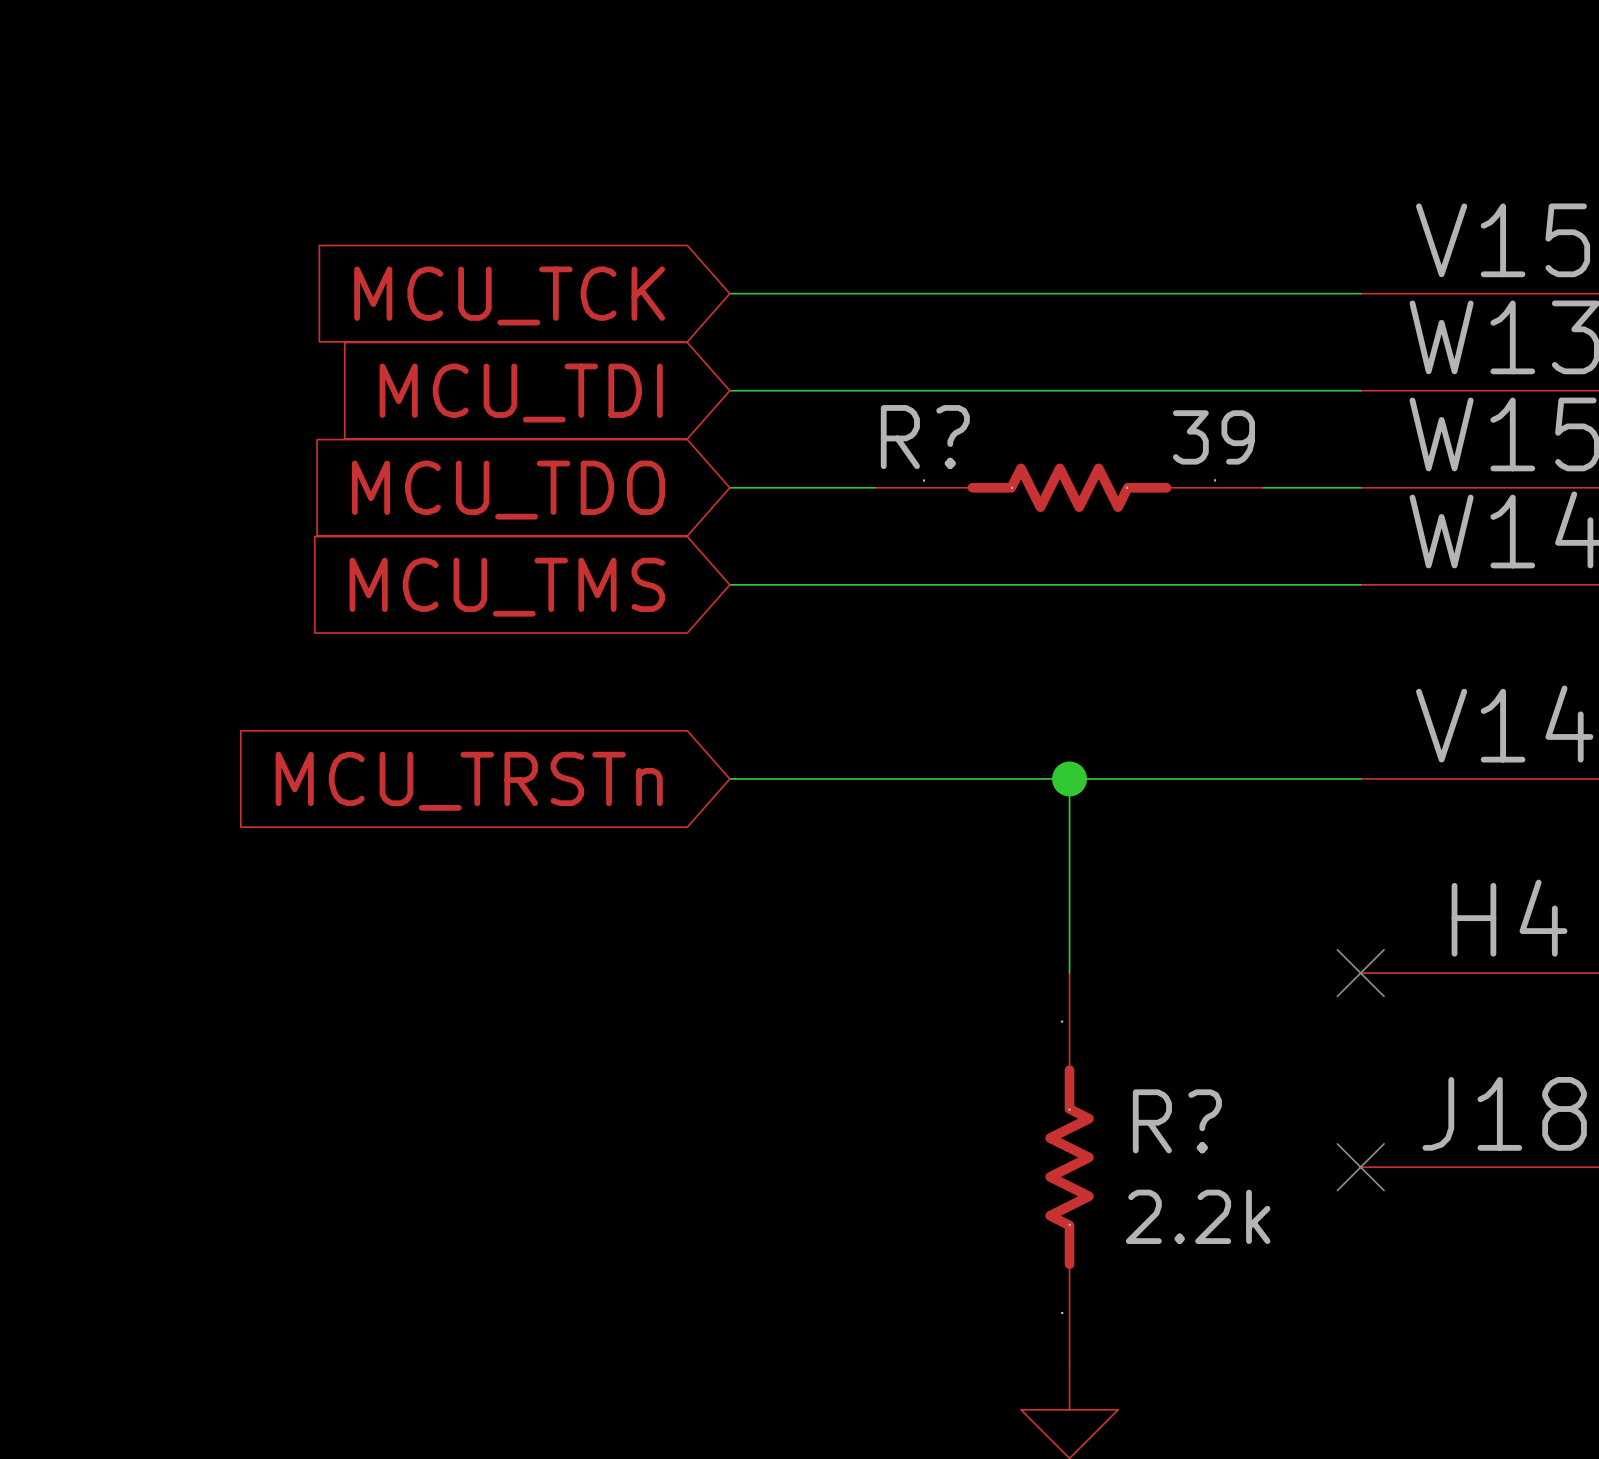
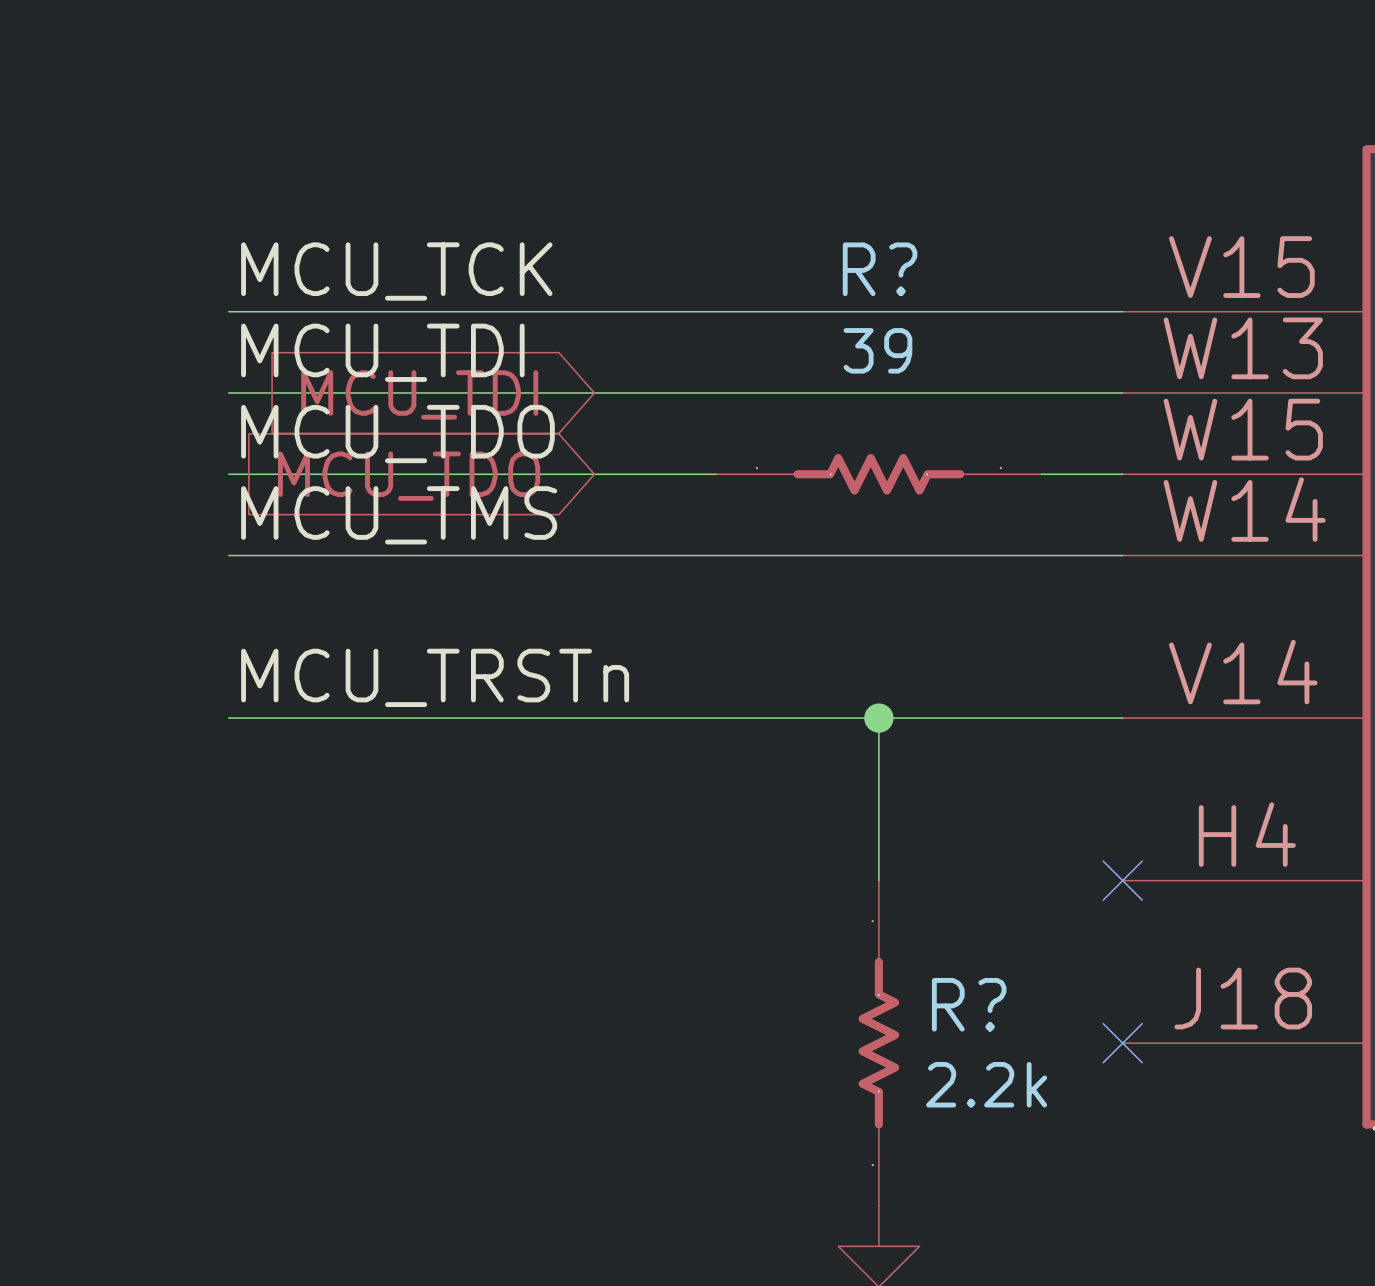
label: none -> MCU_TCK (396, 271)
wire: none -> (228, 311) (594, 311)
global label: MCU_TCK (509, 295) -> none
label: none -> MCU_TDI (382, 352)
wire: none -> (228, 393) (594, 393)
R? name position: R? (925, 437) -> R? (880, 269)
R? value position: 39 (1213, 437) -> 39 (877, 350)
label: none -> MCU_TDO (397, 434)
wire: none -> (228, 474) (594, 474)
label: none -> MCU_TMS (399, 515)
wire: none -> (228, 555) (594, 555)
global label: MCU_TMS (507, 587) -> none
label: none -> MCU_TRSTn (435, 677)
wire: none -> (228, 718) (594, 718)
global label: MCU_TRSTn (469, 781) -> none

